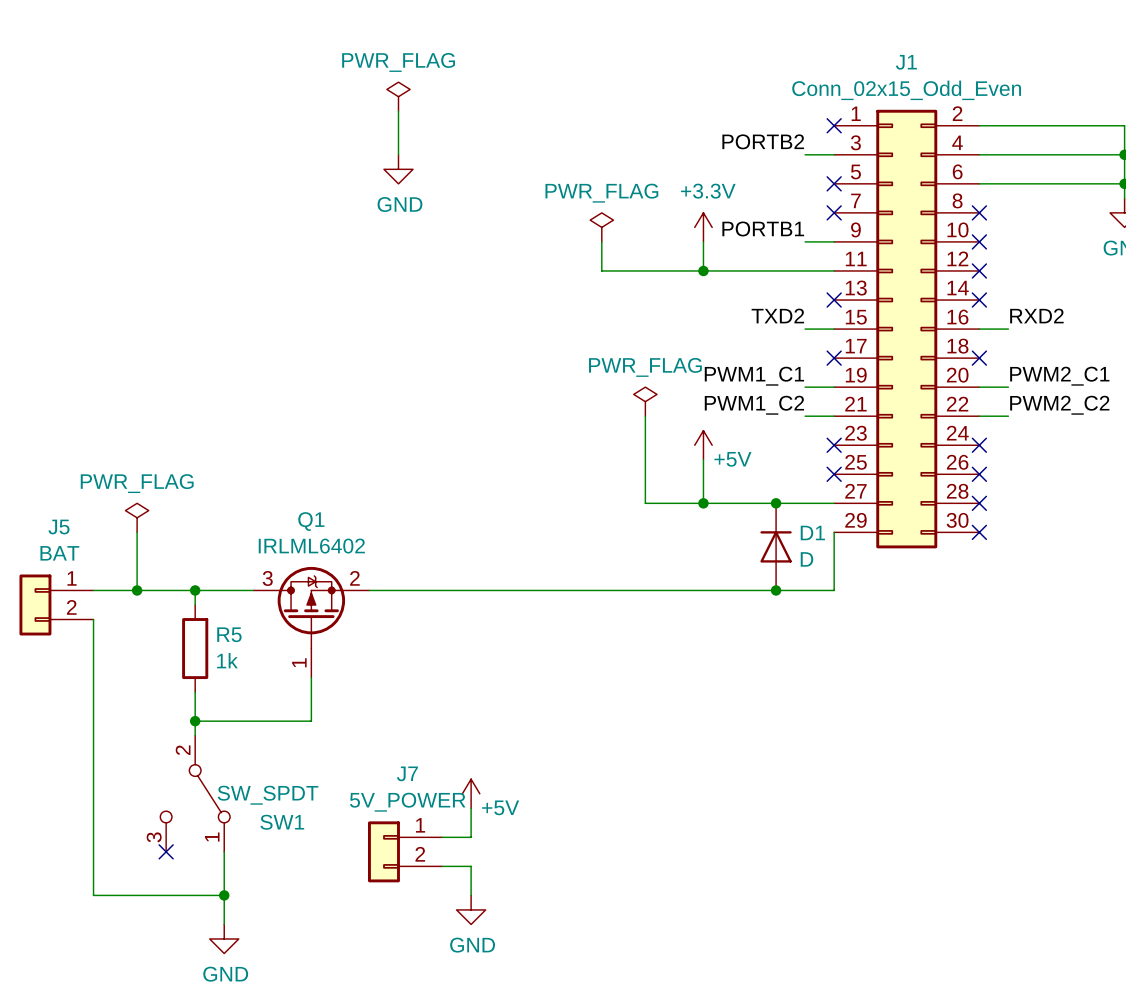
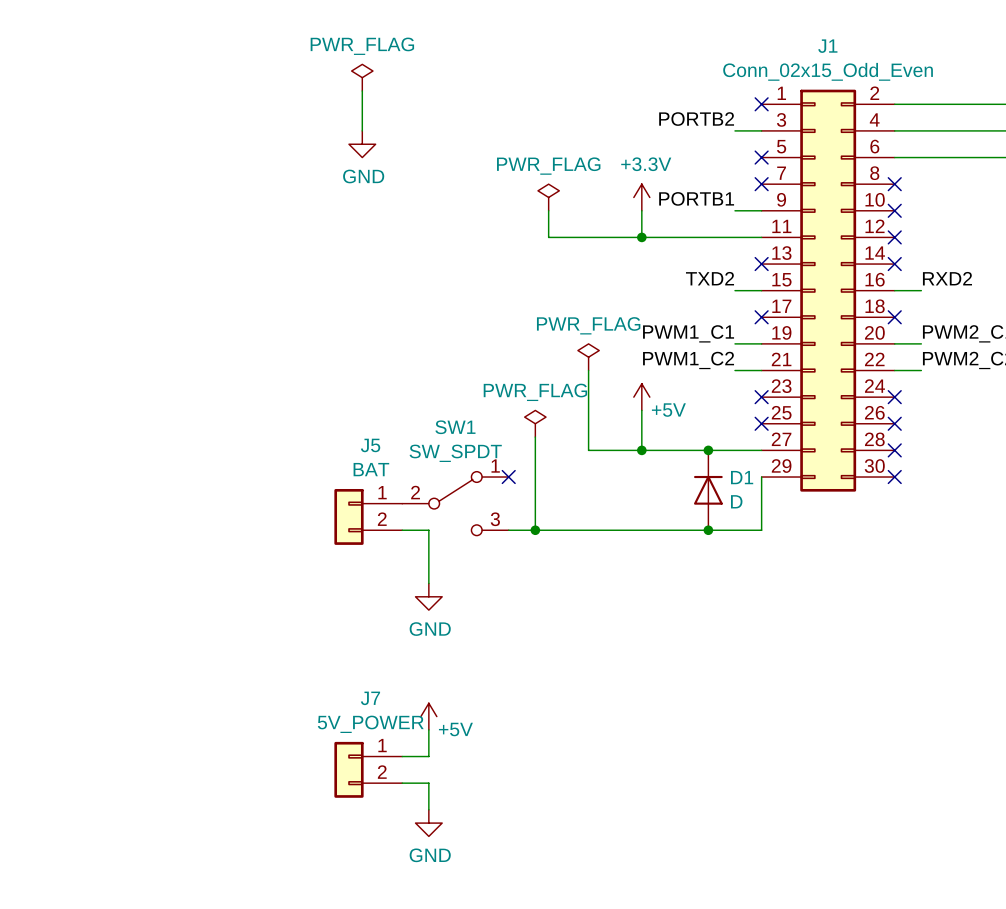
power symbol: none -> PWR_FLAG (535, 423)
wire: none -> (535, 437) (535, 530)
power symbol: PWR_FLAG (137, 517) -> none
wire: (137, 532) (137, 590) -> none
no-connect mark: none -> (508, 477)
wire: (93, 590) (253, 590) -> none
junction: (137, 590) -> none
wire: (195, 590) (195, 604) -> none
junction: (195, 590) -> none
wire: (471, 590) (558, 590) -> (428, 530) (428, 583)
junction: none -> (535, 530)
J5 position: (56, 604) -> (368, 516)
wire: (93, 619) (93, 895) (224, 895) -> none
Q1: IRLML6402 (311, 622) -> none
R5: 1k (195, 648) -> none
power symbol: none -> GND (428, 596)
wire: (311, 677) (311, 721) (195, 721) -> none
wire: (195, 692) (195, 735) -> none
junction: (195, 721) -> none
SW1 rotation: 0° (195, 793) -> 90° counterclockwise (455, 503)
SW1 position: (195, 793) -> (455, 503)
SW1 name position: SW1 (282, 822) -> SW1 (455, 427)
no-connect mark: (166, 851) -> none
wire: (224, 851) (224, 924) -> none
junction: (224, 895) -> none
power symbol: GND (224, 938) -> none

